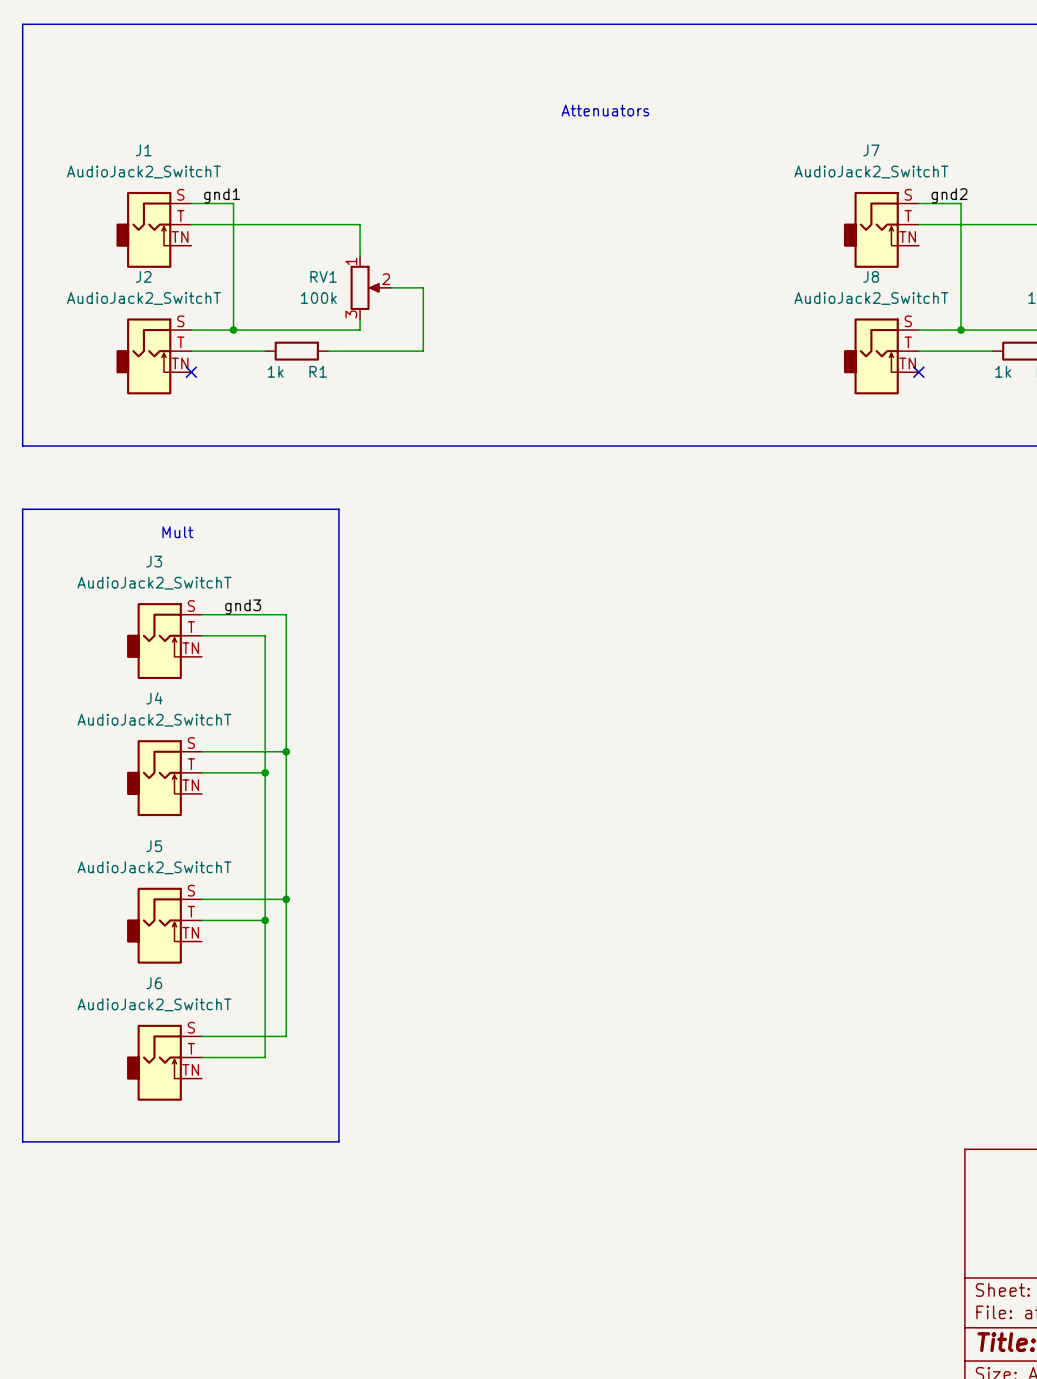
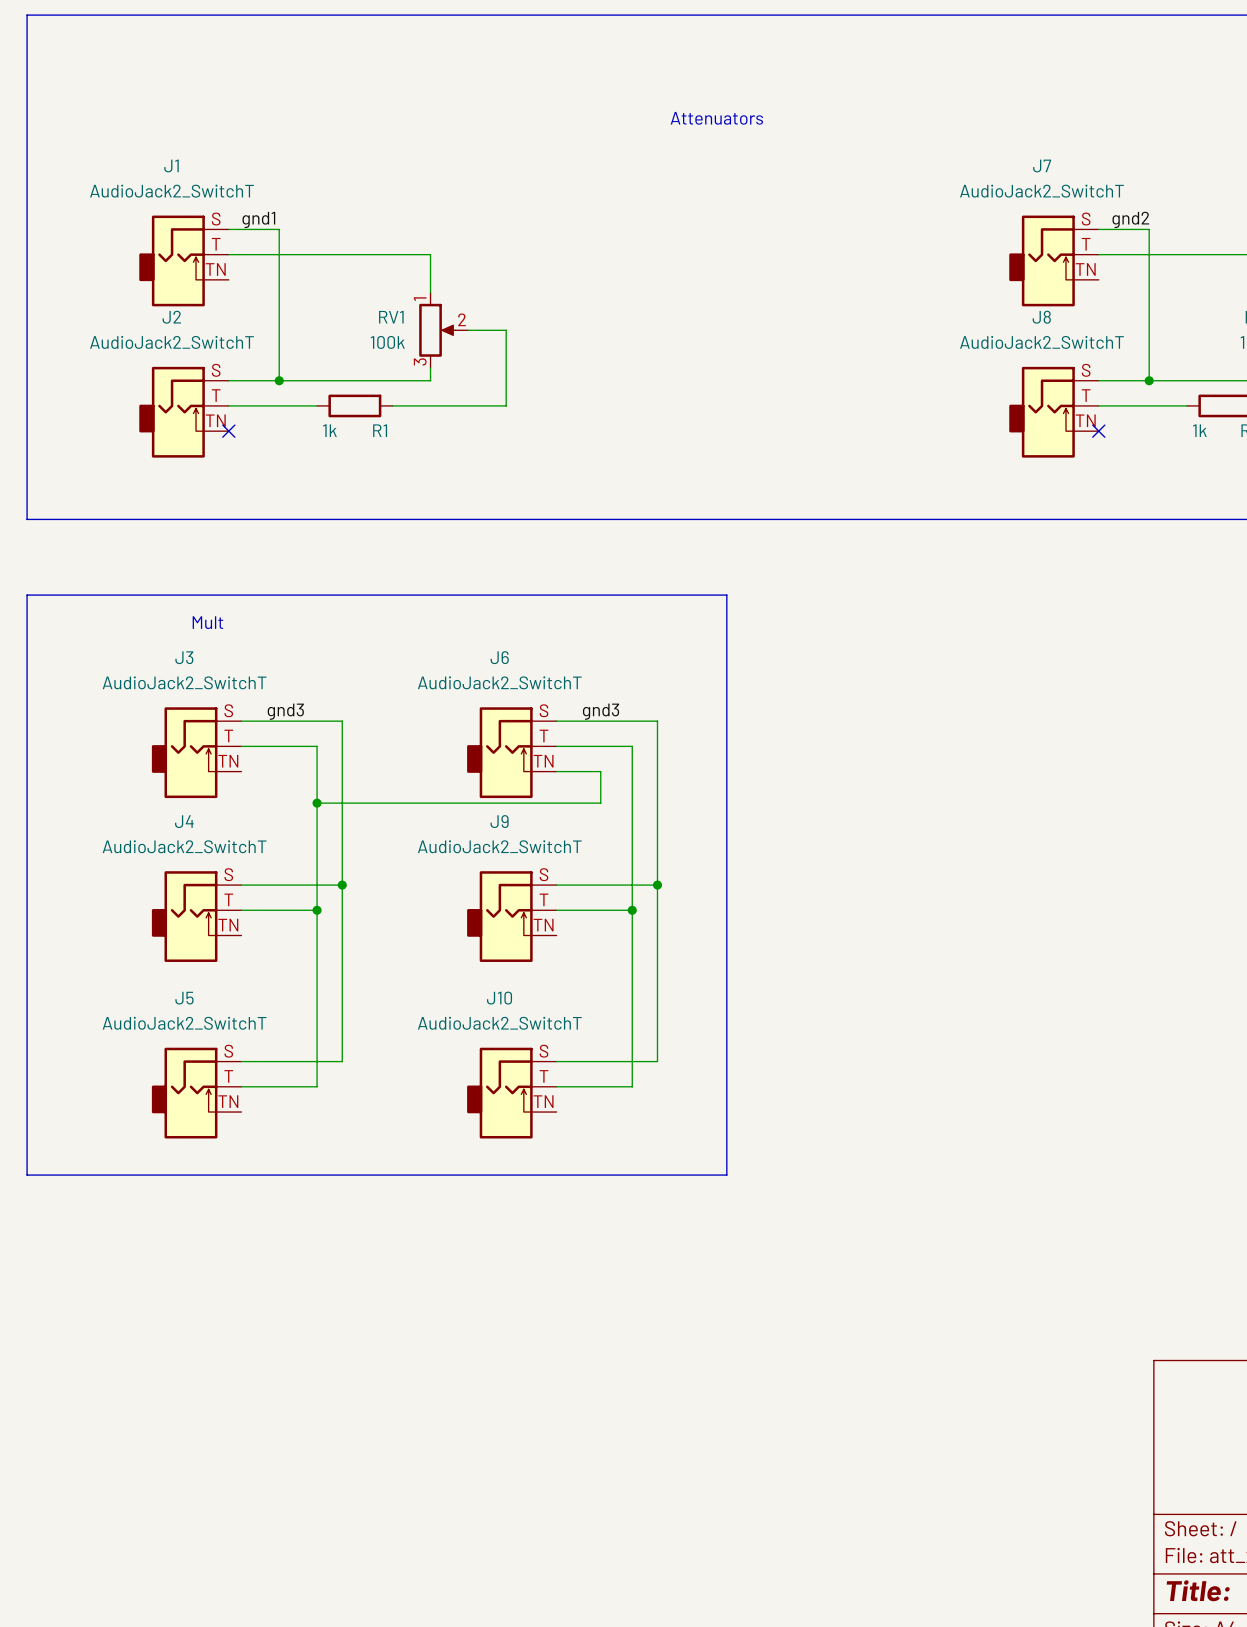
line: (338, 509) (338, 1141) (22, 1141) (22, 994) -> (405, 595) (726, 595) (726, 1175) (27, 1175)
label: none -> gnd3 (601, 711)
wire: none -> (556, 721) (657, 721) (657, 1061) (556, 1061)
wire: none -> (556, 746) (632, 746) (632, 1086) (556, 1086)
wire: none -> (556, 771) (600, 771) (600, 803) (317, 803)
junction: none -> (317, 803)
wire: none -> (556, 885) (657, 885)
junction: none -> (657, 885)
wire: none -> (556, 910) (632, 910)
junction: none -> (632, 910)
J9: none -> AudioJack2_SwitchT (511, 916)
wire: (286, 899) (286, 1036) (201, 1036) -> none
junction: (286, 899) -> none
wire: (265, 920) (265, 1057) (201, 1057) -> none
junction: (265, 920) -> none
J10: none -> AudioJack2_SwitchT (511, 1093)
J6 position: (164, 1062) -> (511, 752)

